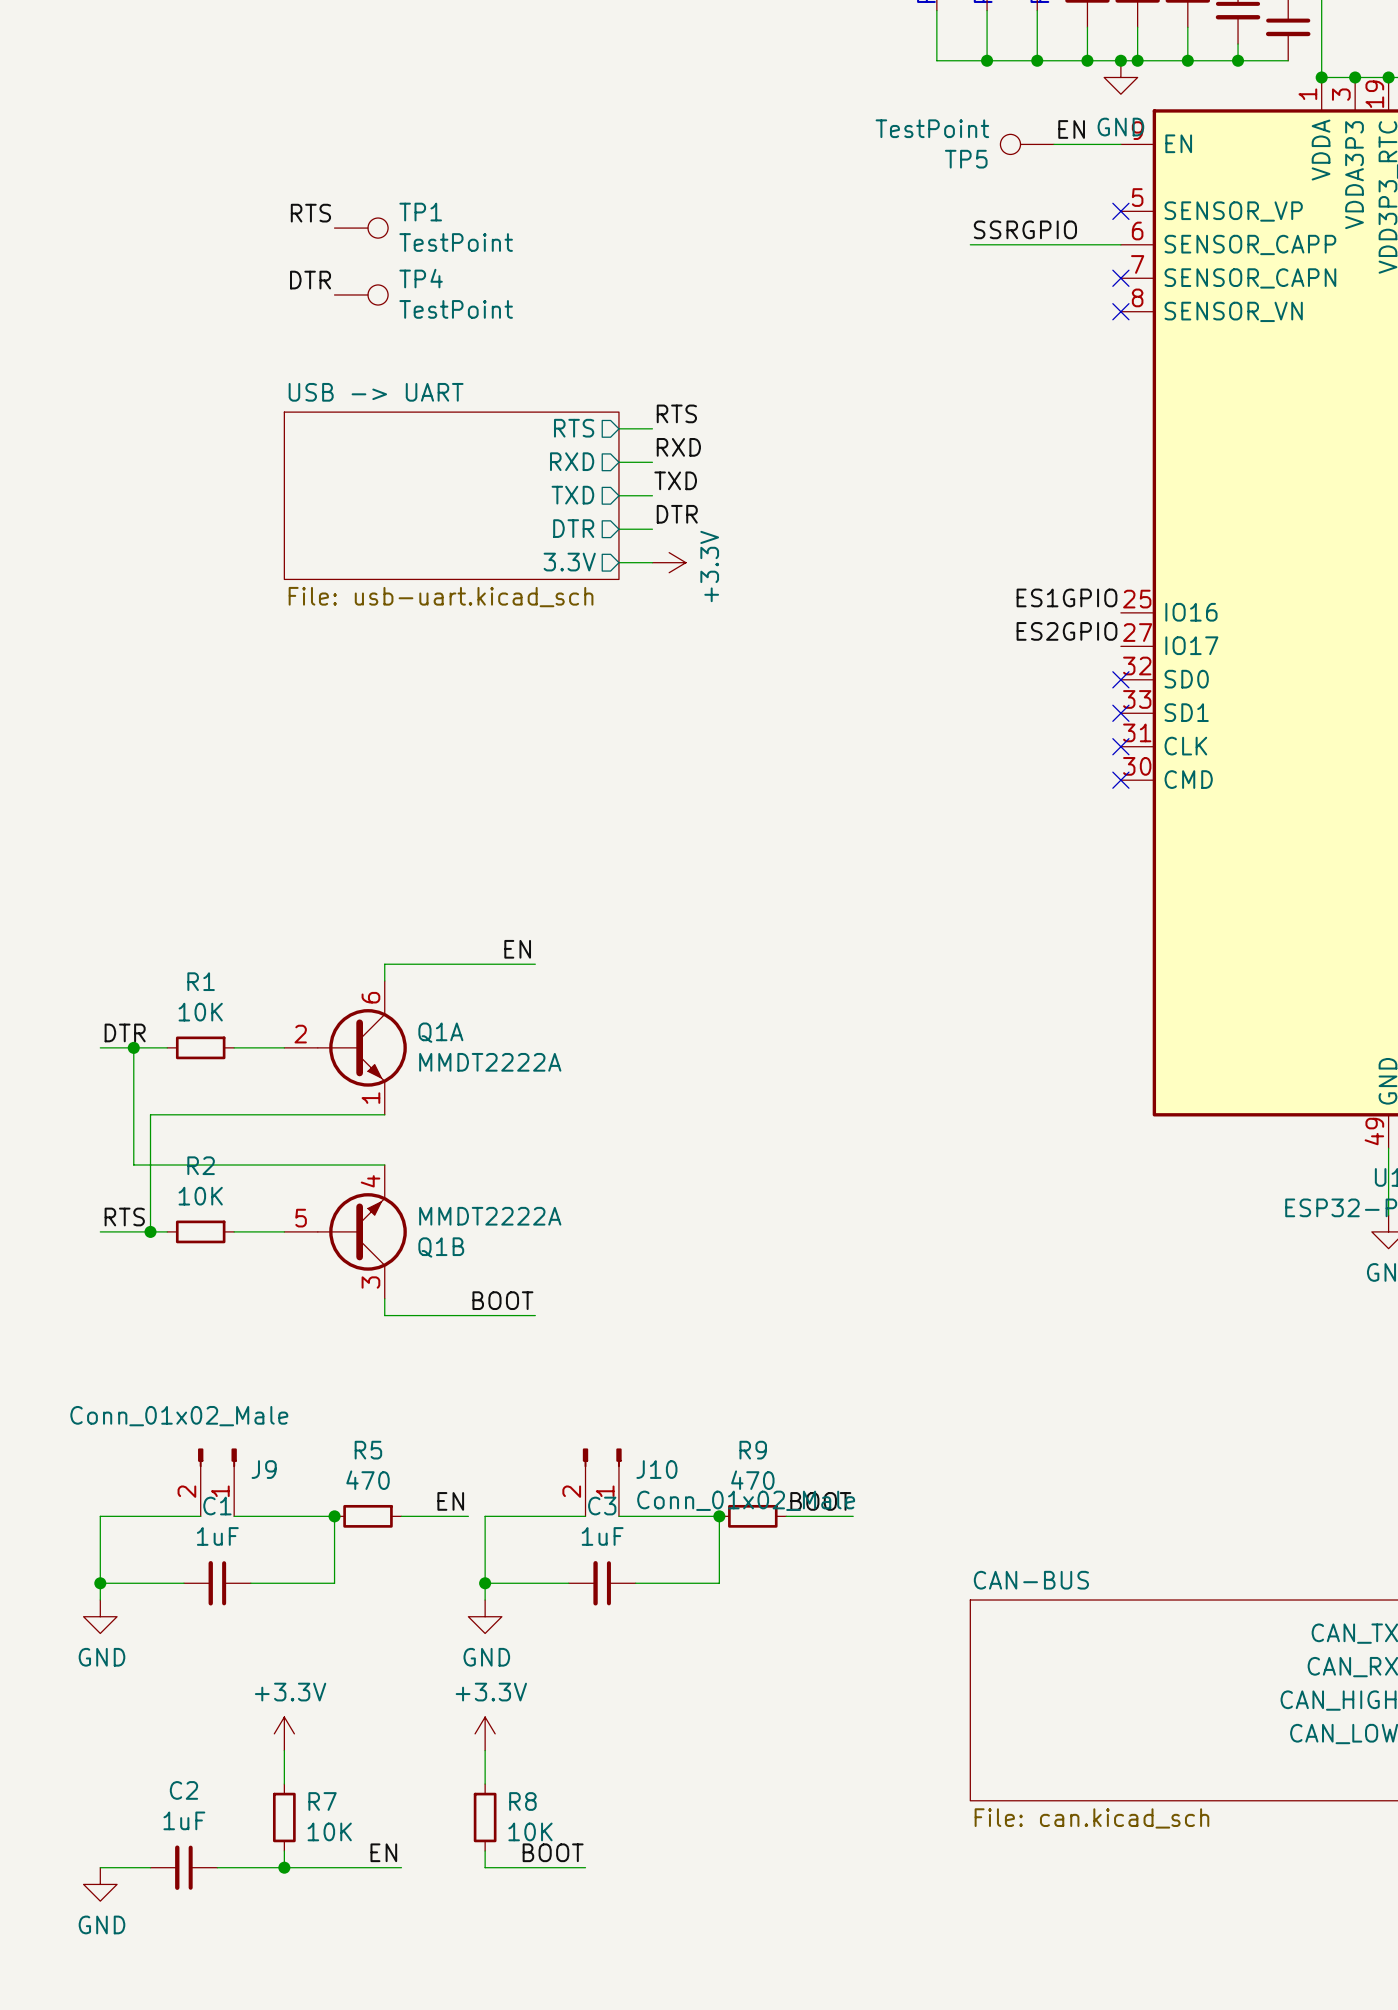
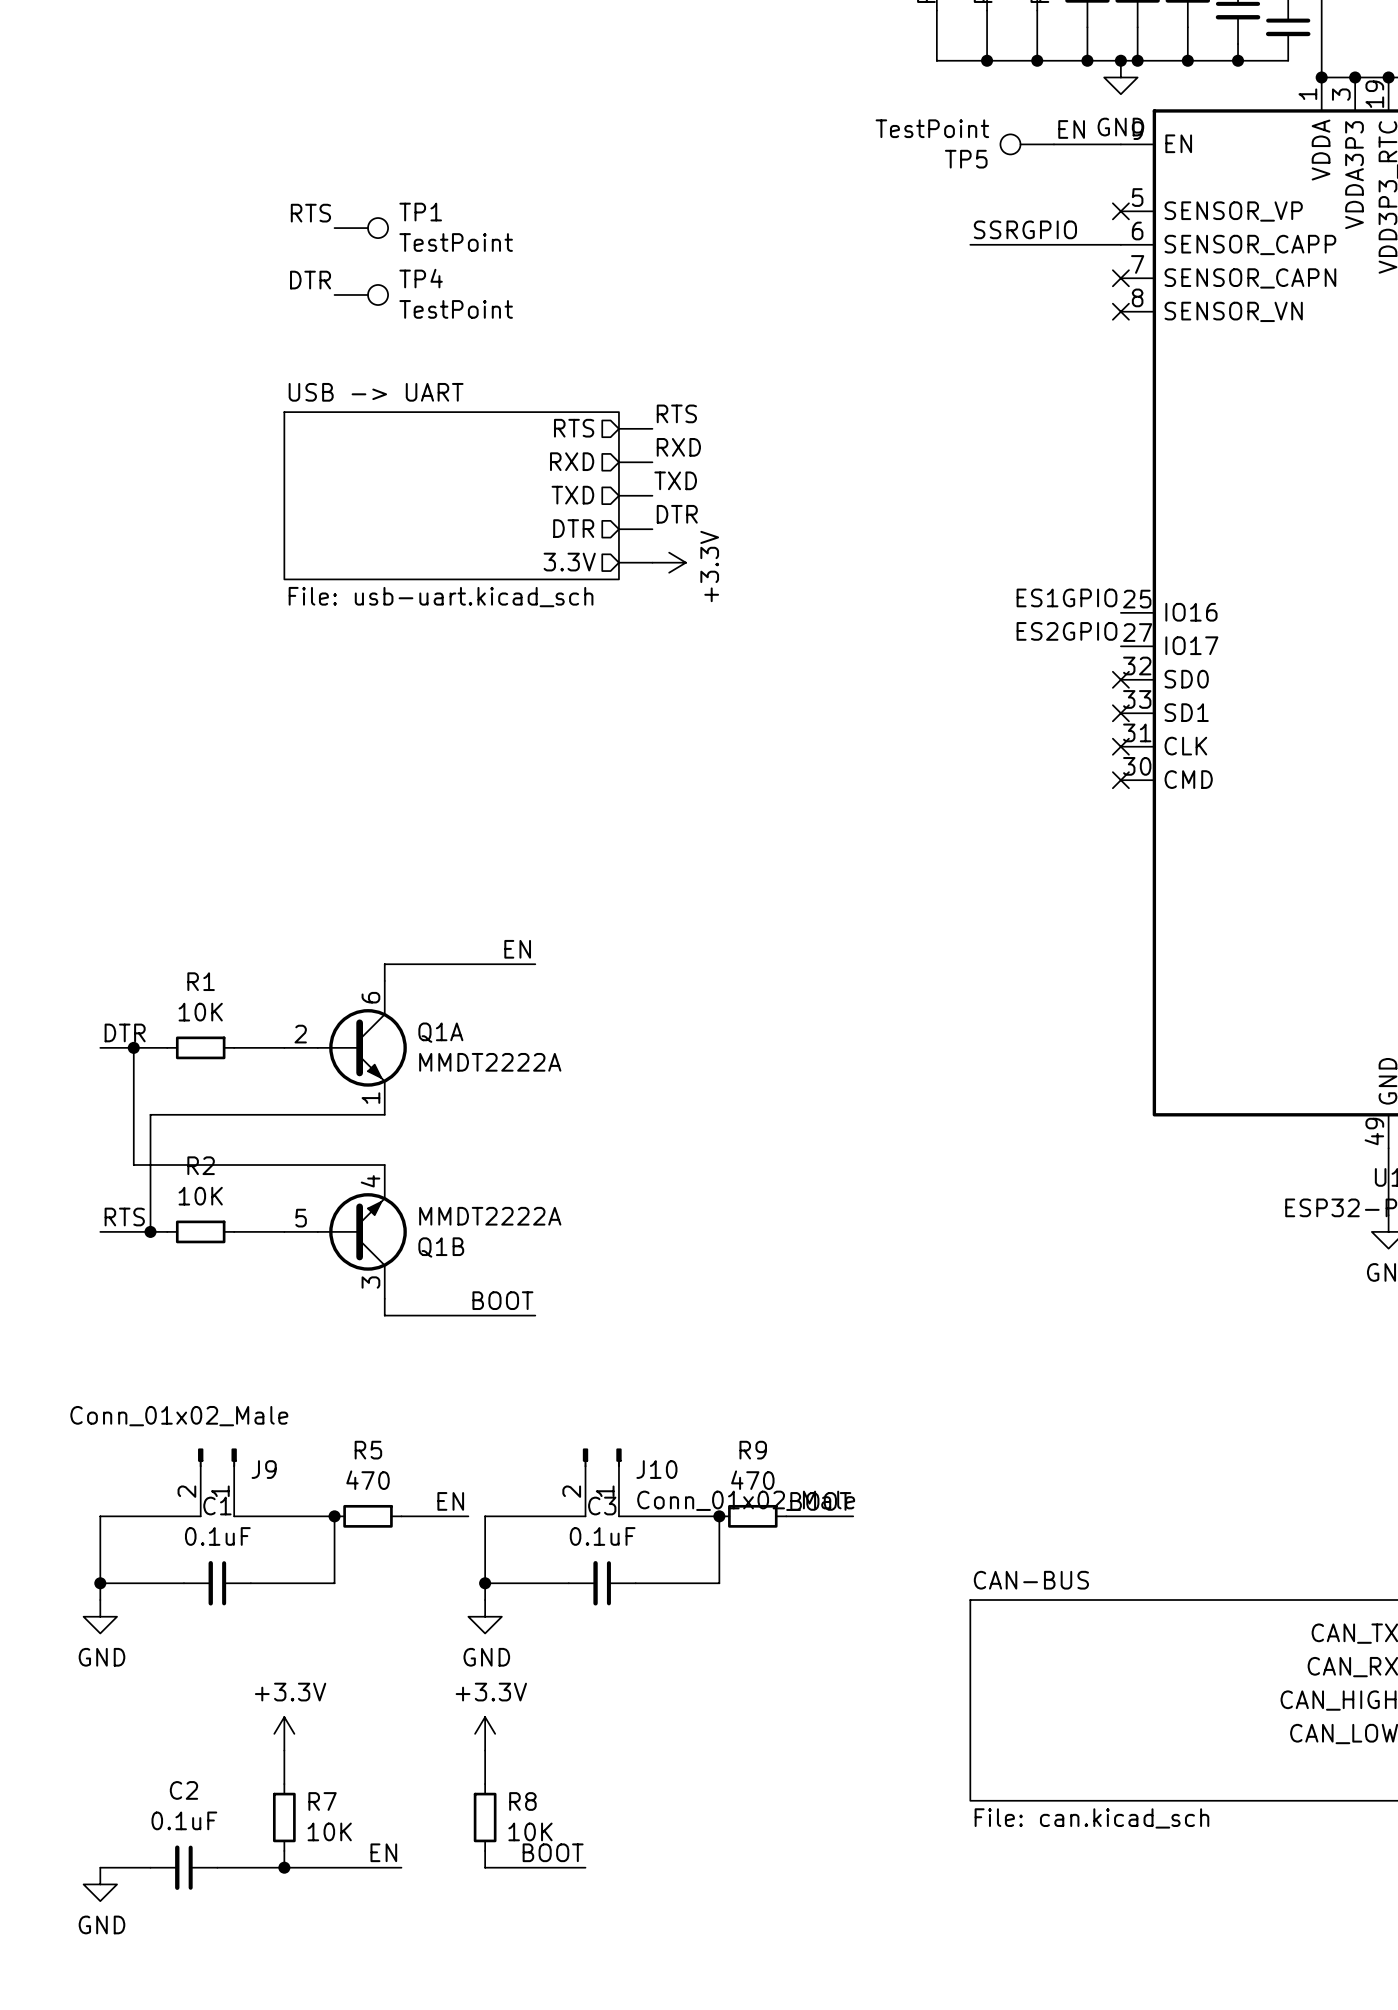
C1 value: 1uF (217, 1536) -> 0.1uF (217, 1536)
C3 value: 1uF (602, 1536) -> 0.1uF (602, 1536)
C2 value: 1uF (184, 1820) -> 0.1uF (184, 1820)

